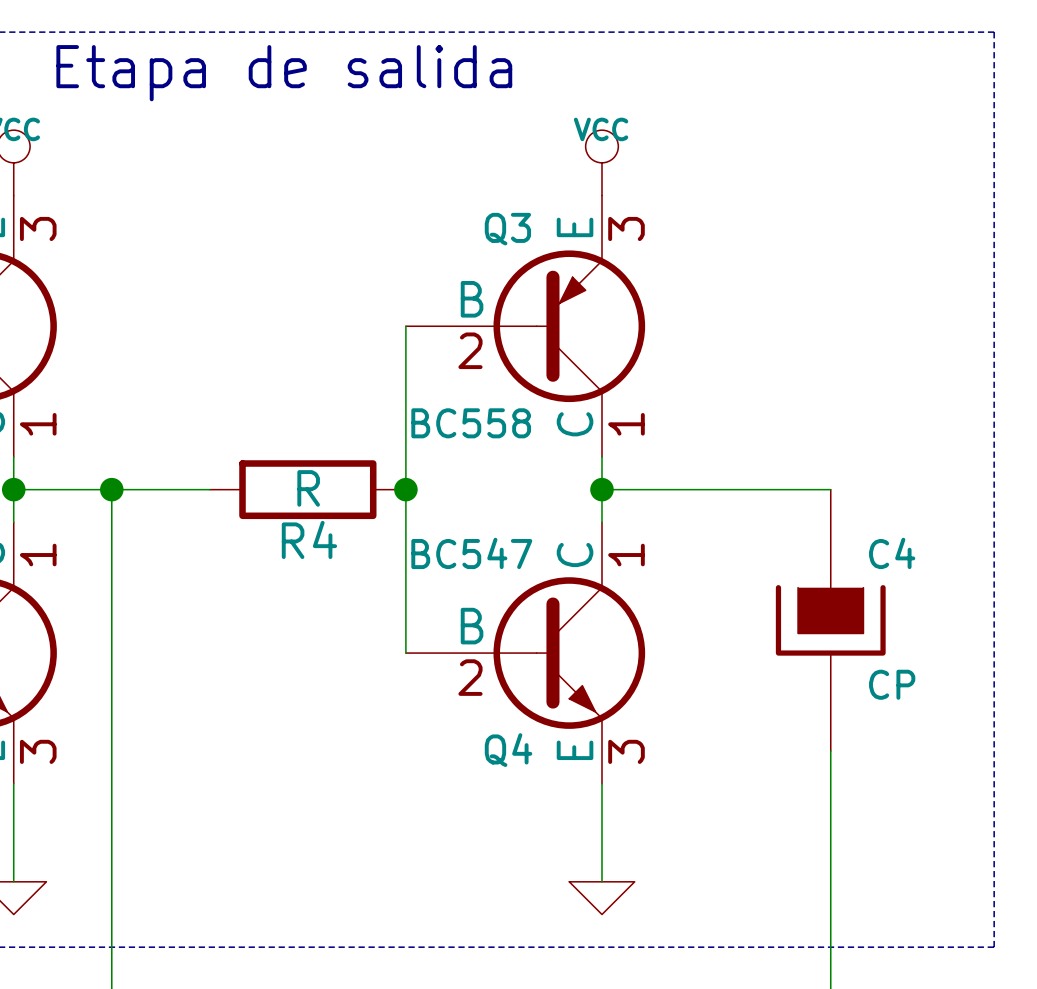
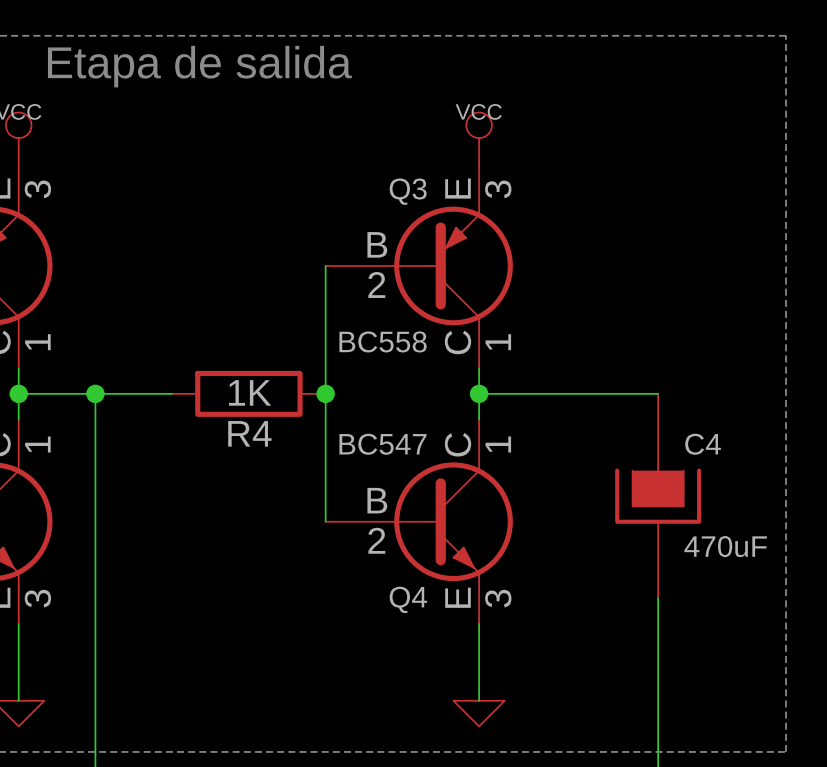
R4 value: R (308, 488) -> 1K (250, 392)
C4 value: CP (892, 684) -> 470uF (725, 546)

